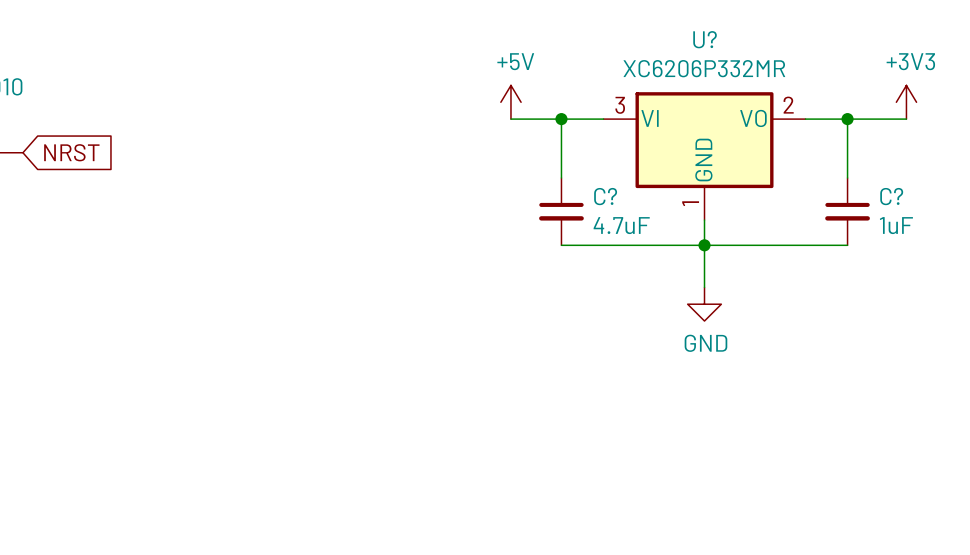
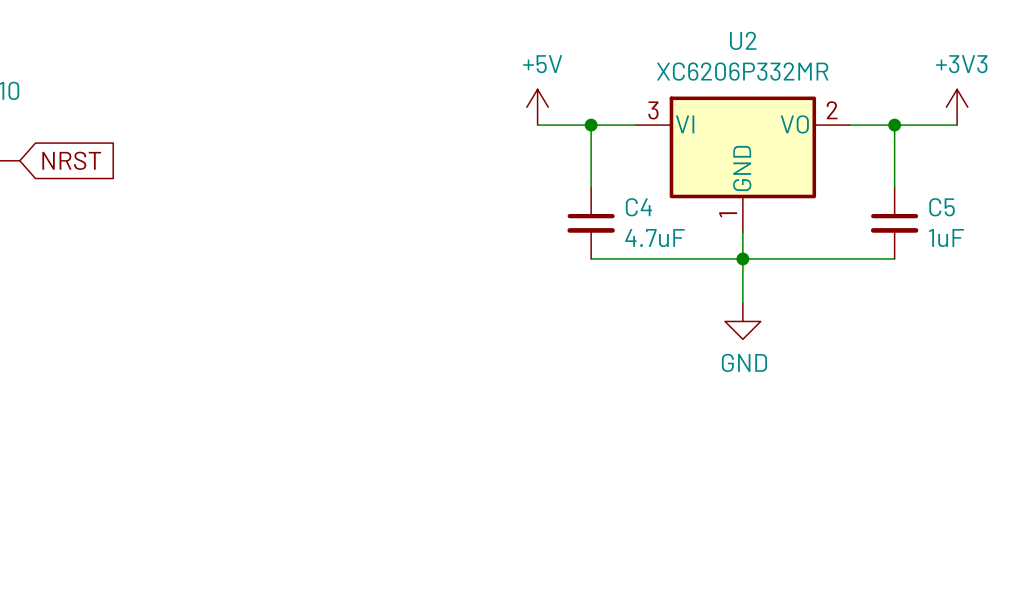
U? name: U? (705, 39) -> U2 (743, 40)
C? name: C? (605, 196) -> C4 (638, 207)
C? name: C? (891, 196) -> C5 (942, 207)

